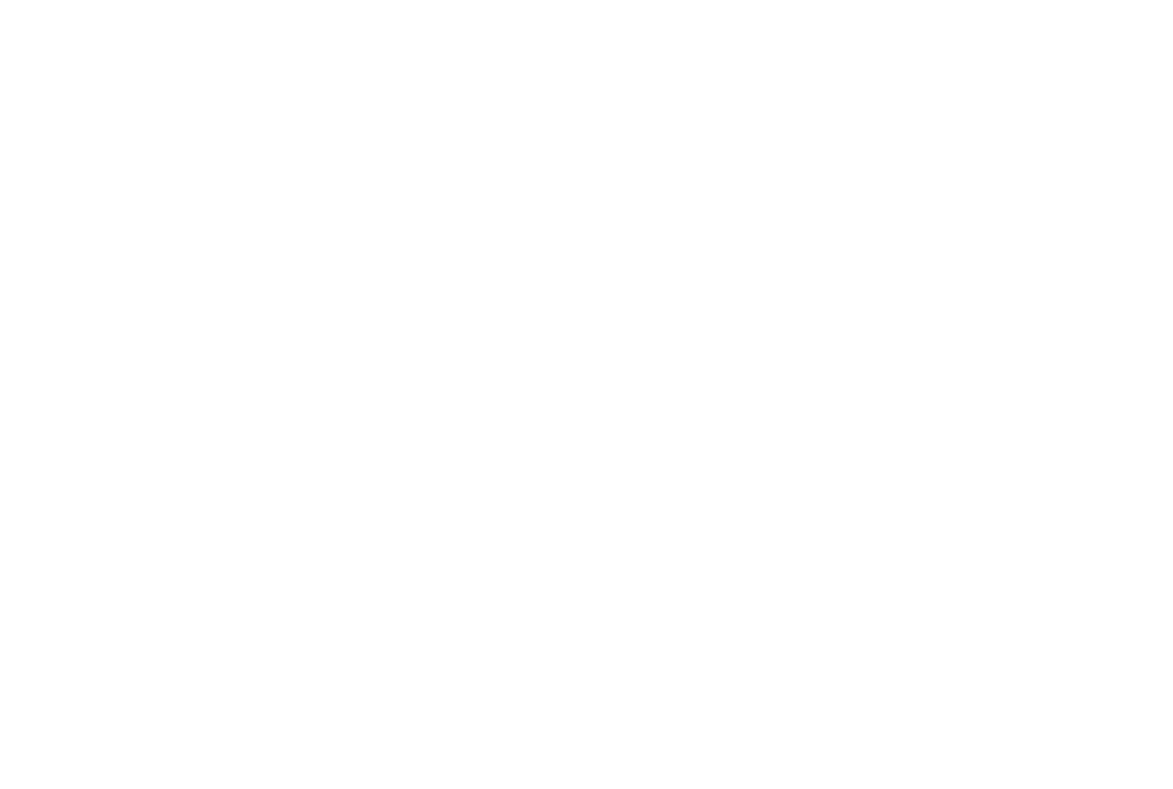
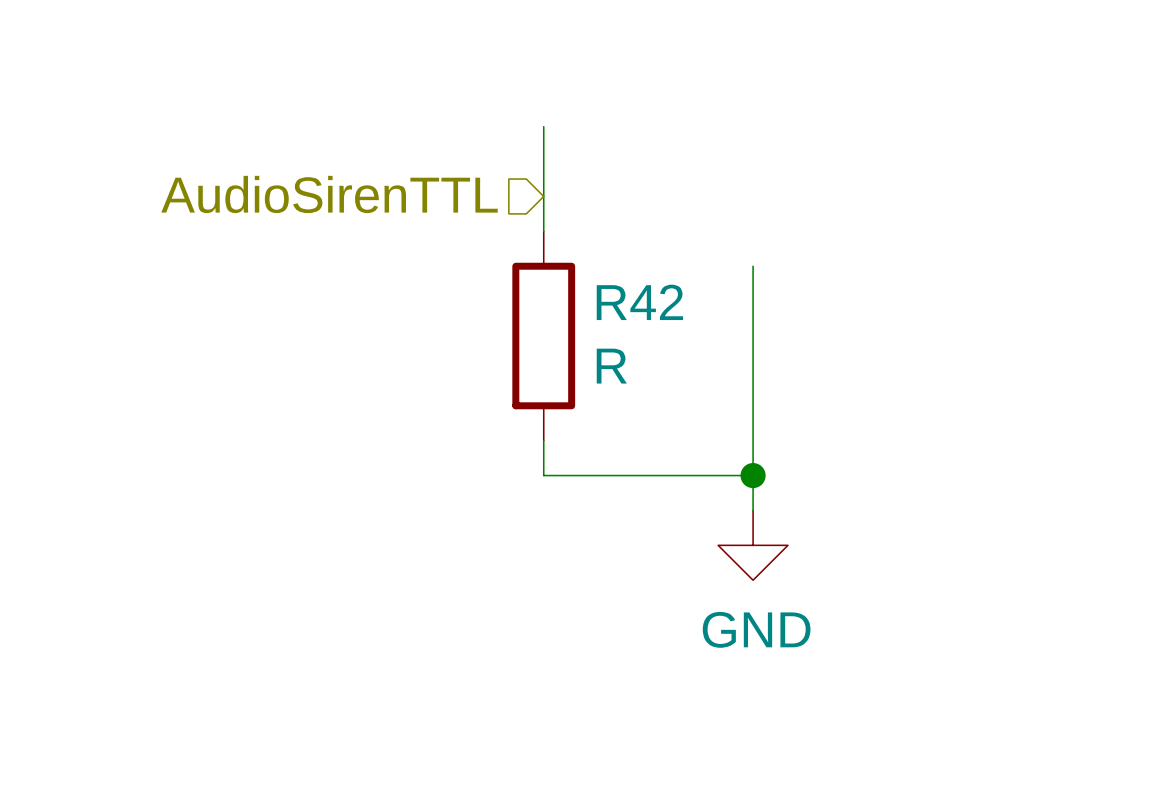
wire: none -> (543, 126) (543, 231)
hierarchical label: none -> AudioSirenTTL (329, 194)
wire: none -> (753, 266) (753, 510)
R42: none -> R (543, 336)
wire: none -> (543, 440) (543, 475) (753, 475)
junction: none -> (753, 475)
power symbol: none -> GND (753, 545)

